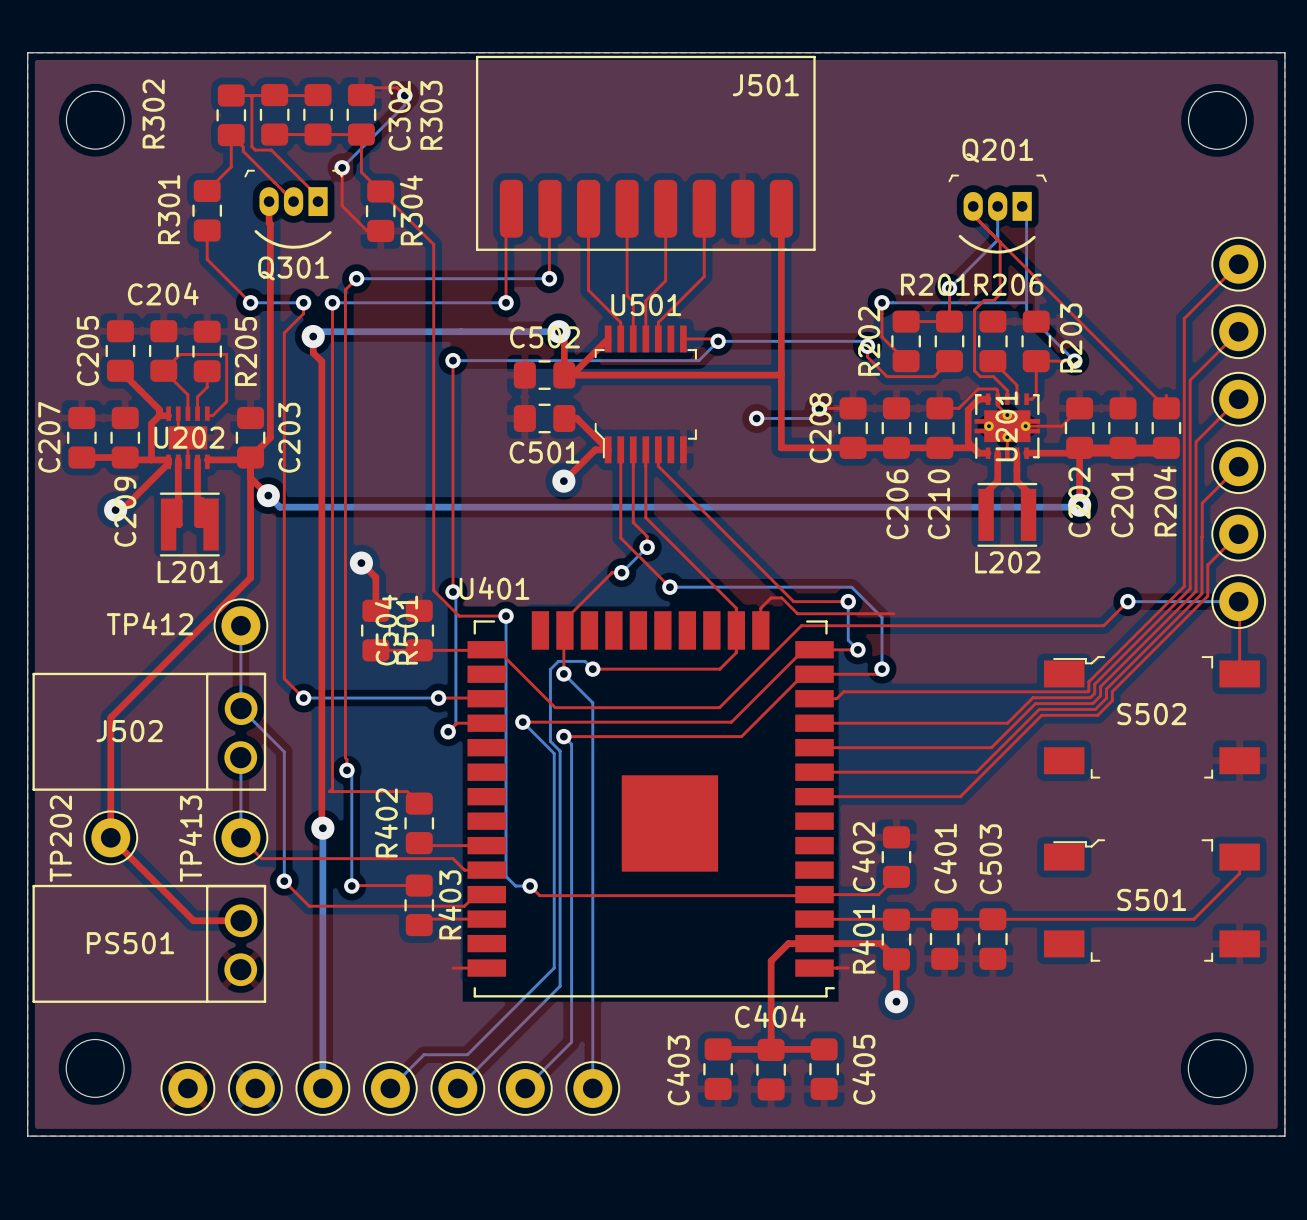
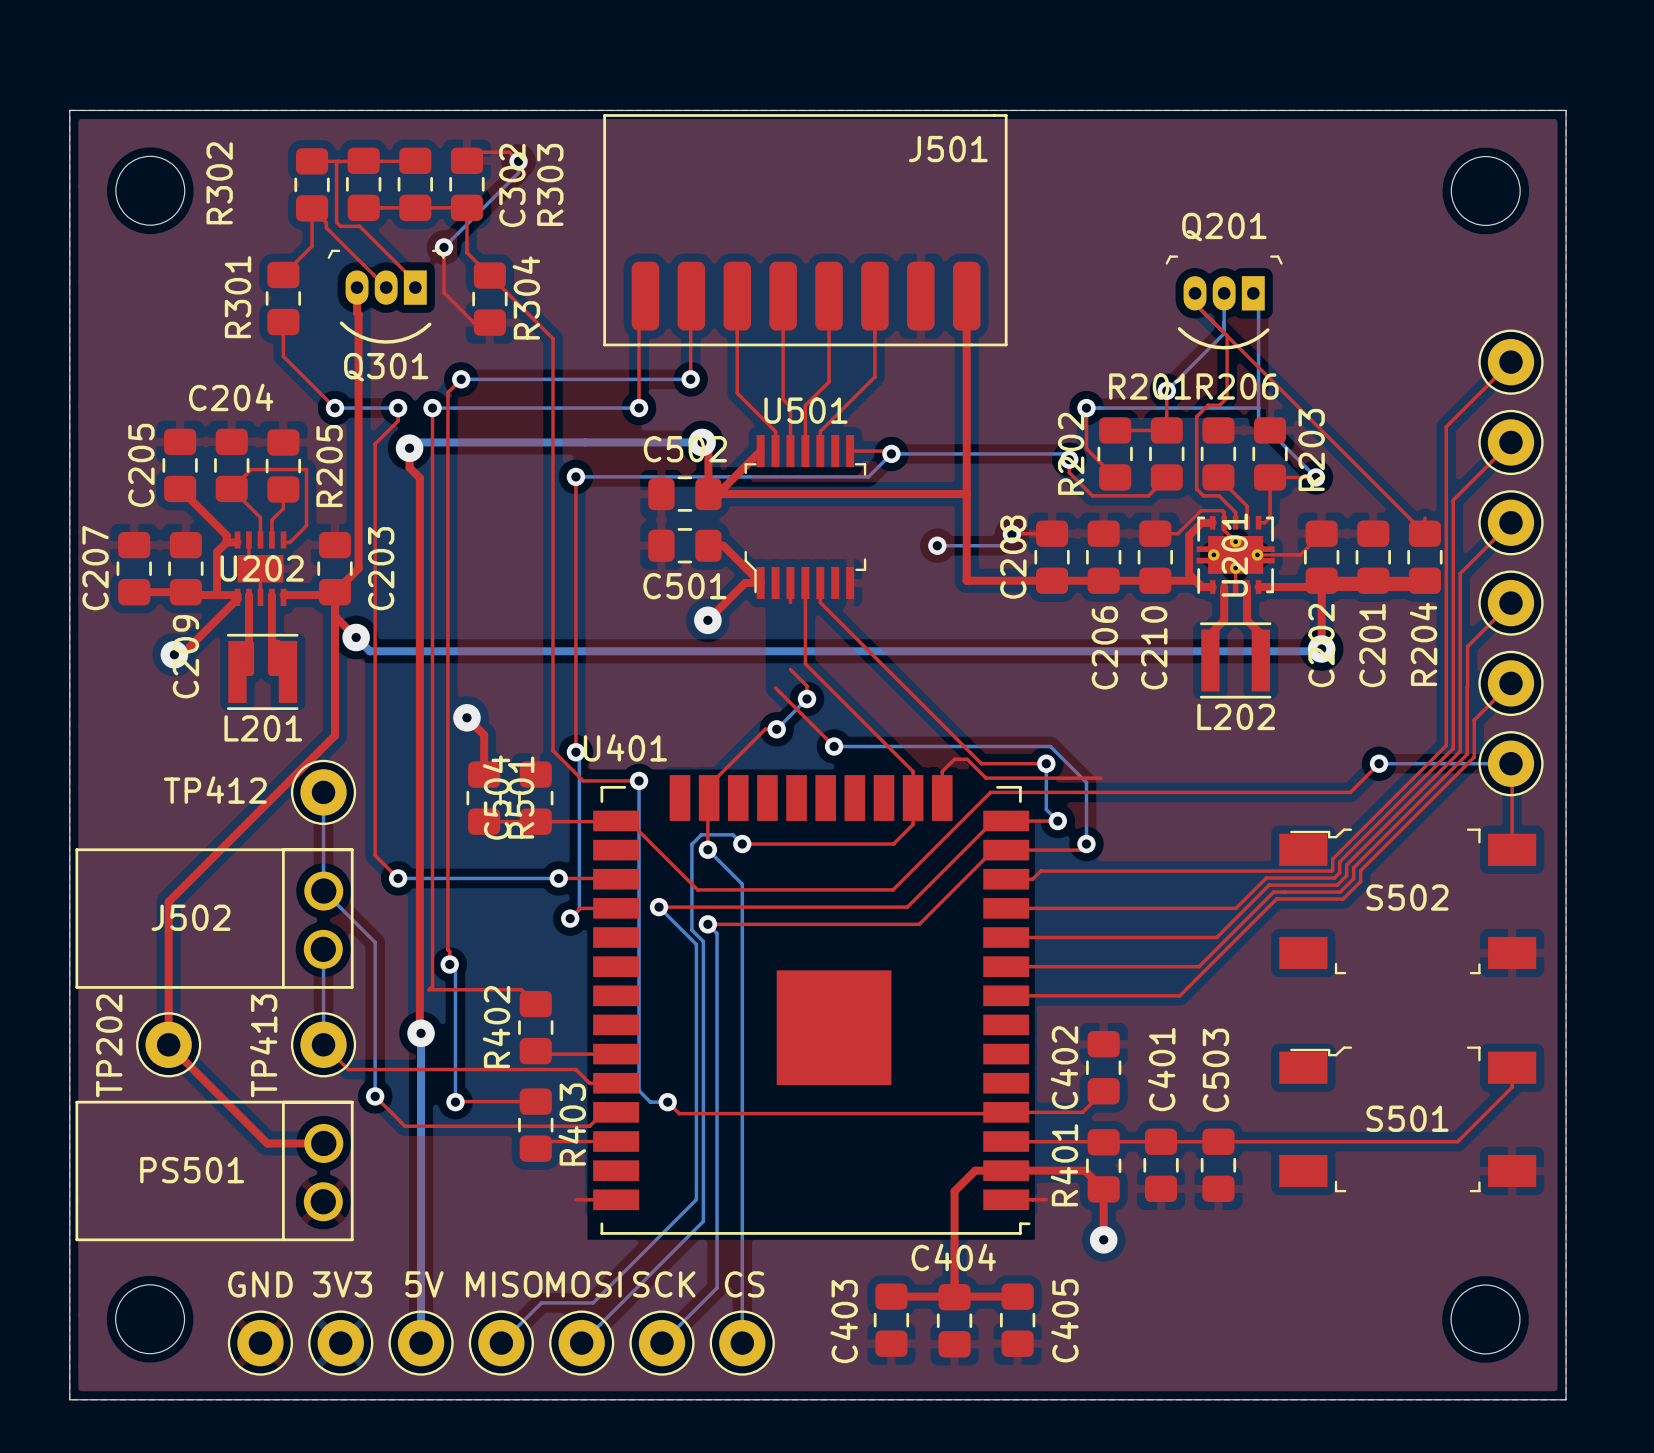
top track: (620, 449) (620, 538) -> none
top track: (633, 466) (633, 522) -> none
text: none -> GND (260, 1284)
text: none -> 3V3 (342, 1284)
text: none -> 5V (424, 1284)
text: none -> MISO (504, 1284)
text: none -> MOSI (583, 1284)
text: none -> SCK (664, 1284)
text: none -> CS (744, 1284)

